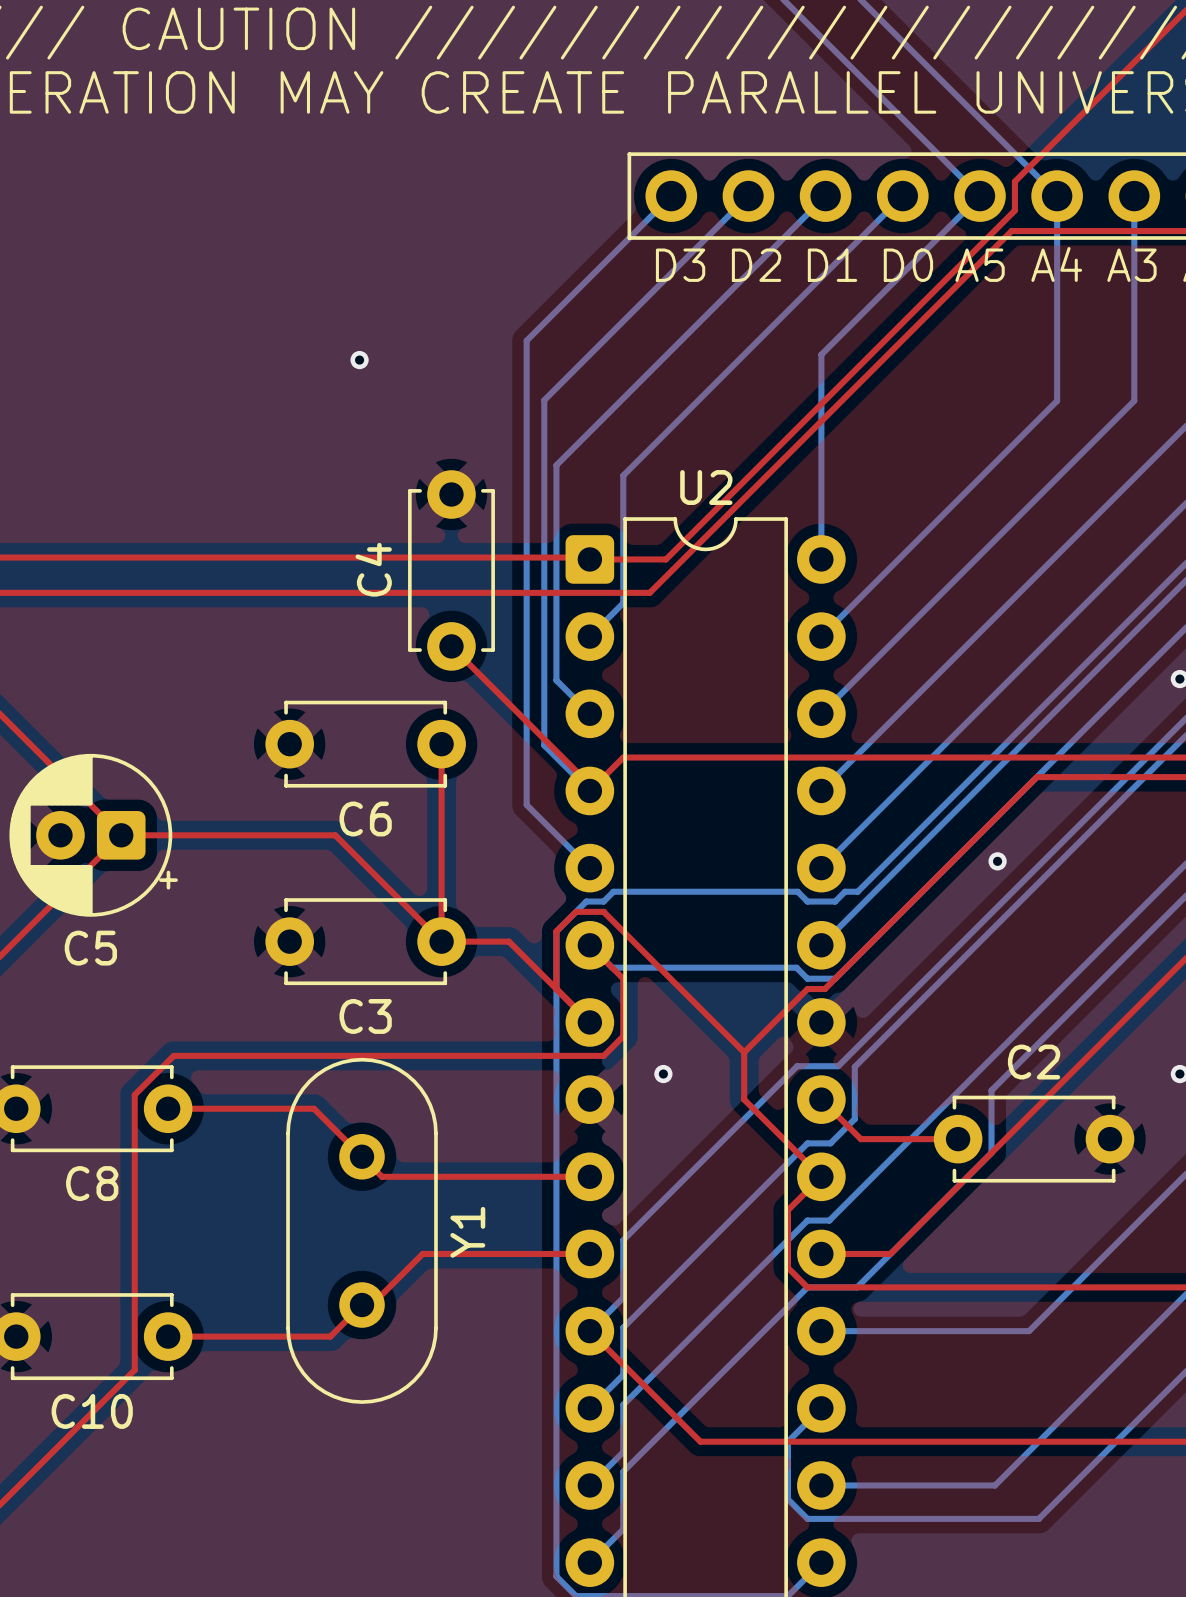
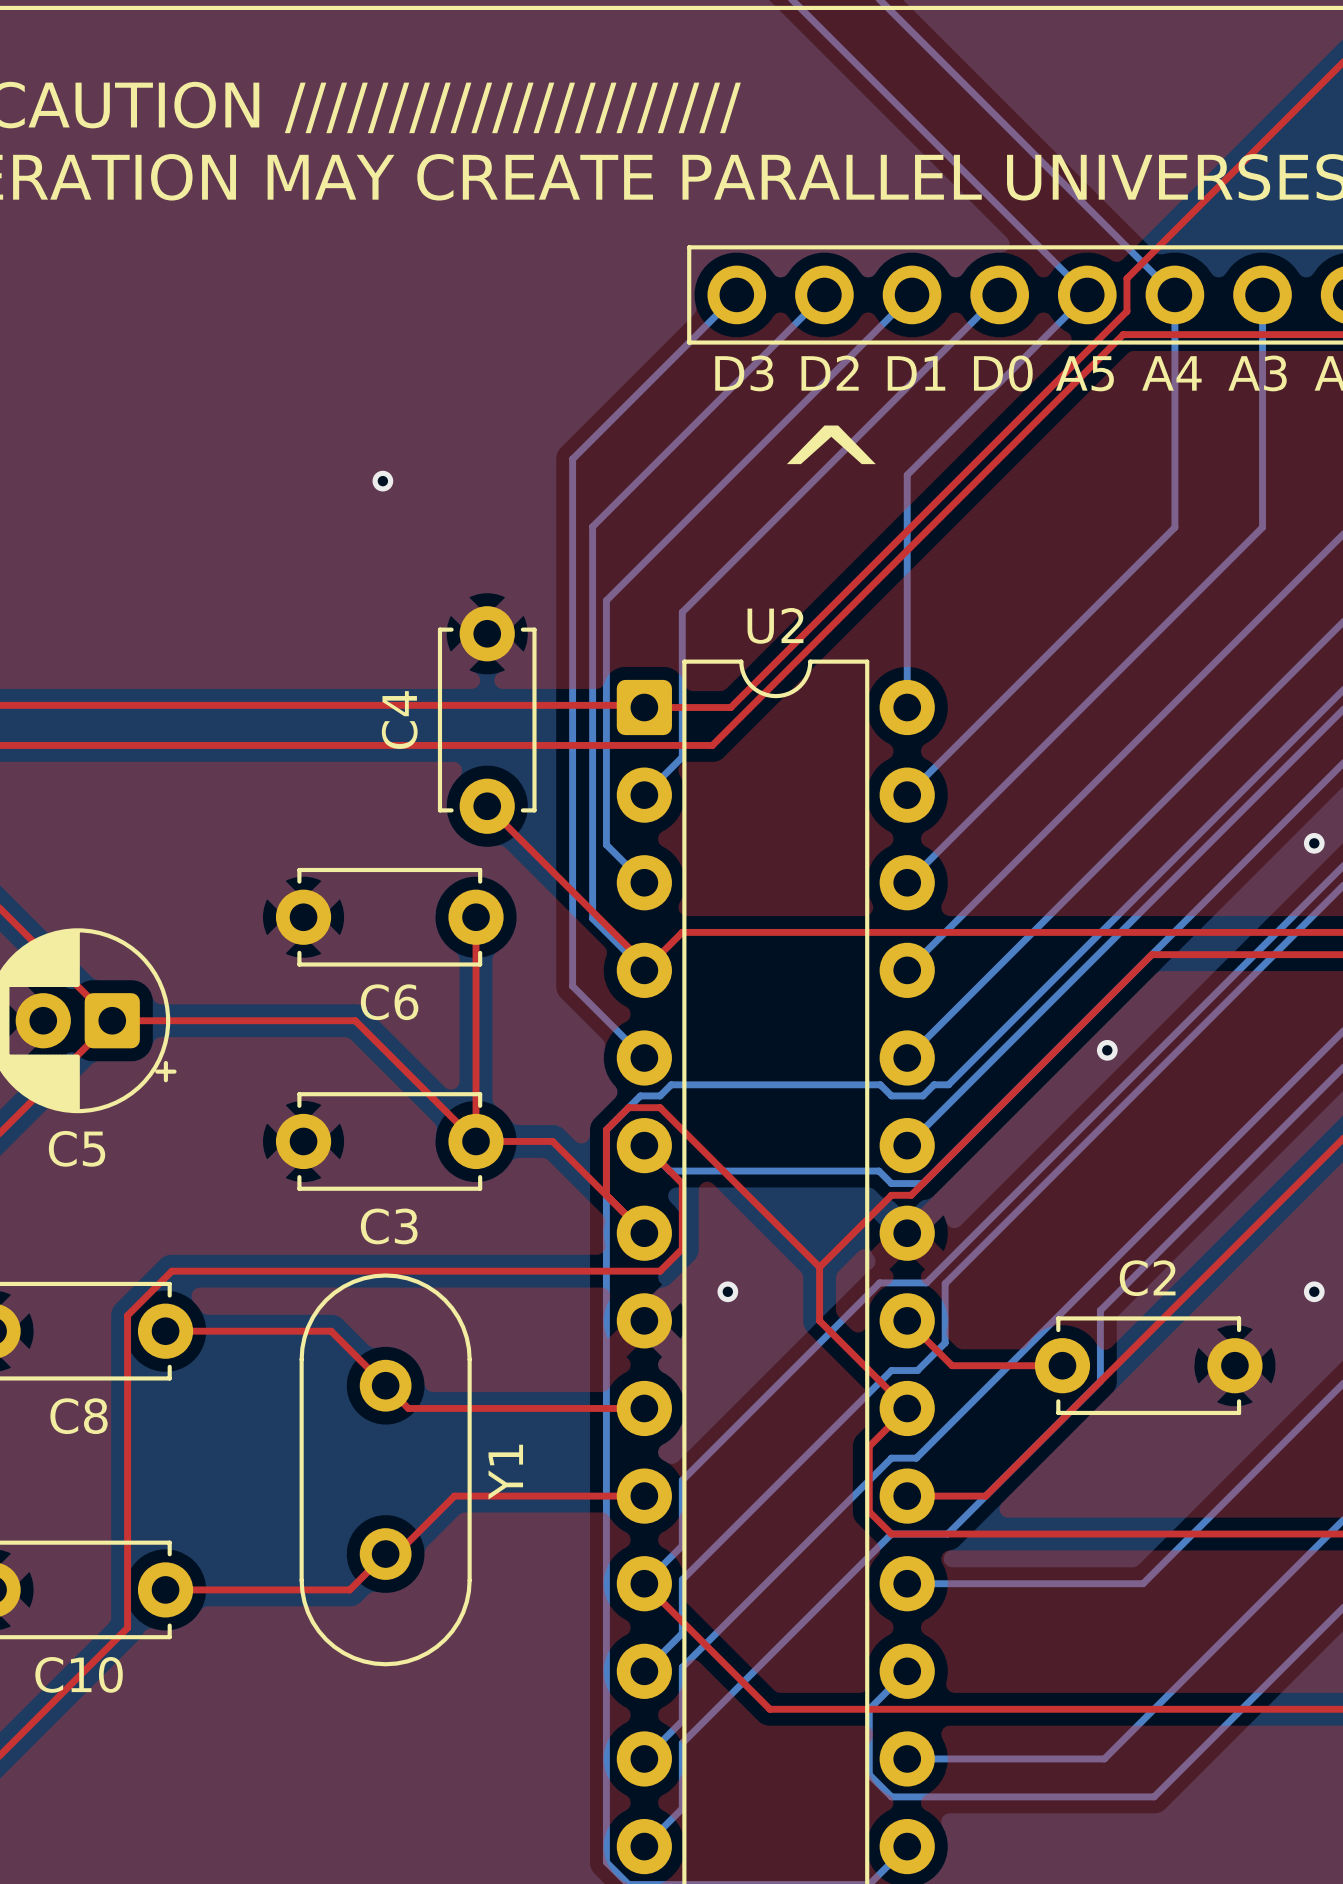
text: none -> ^ (831, 444)

